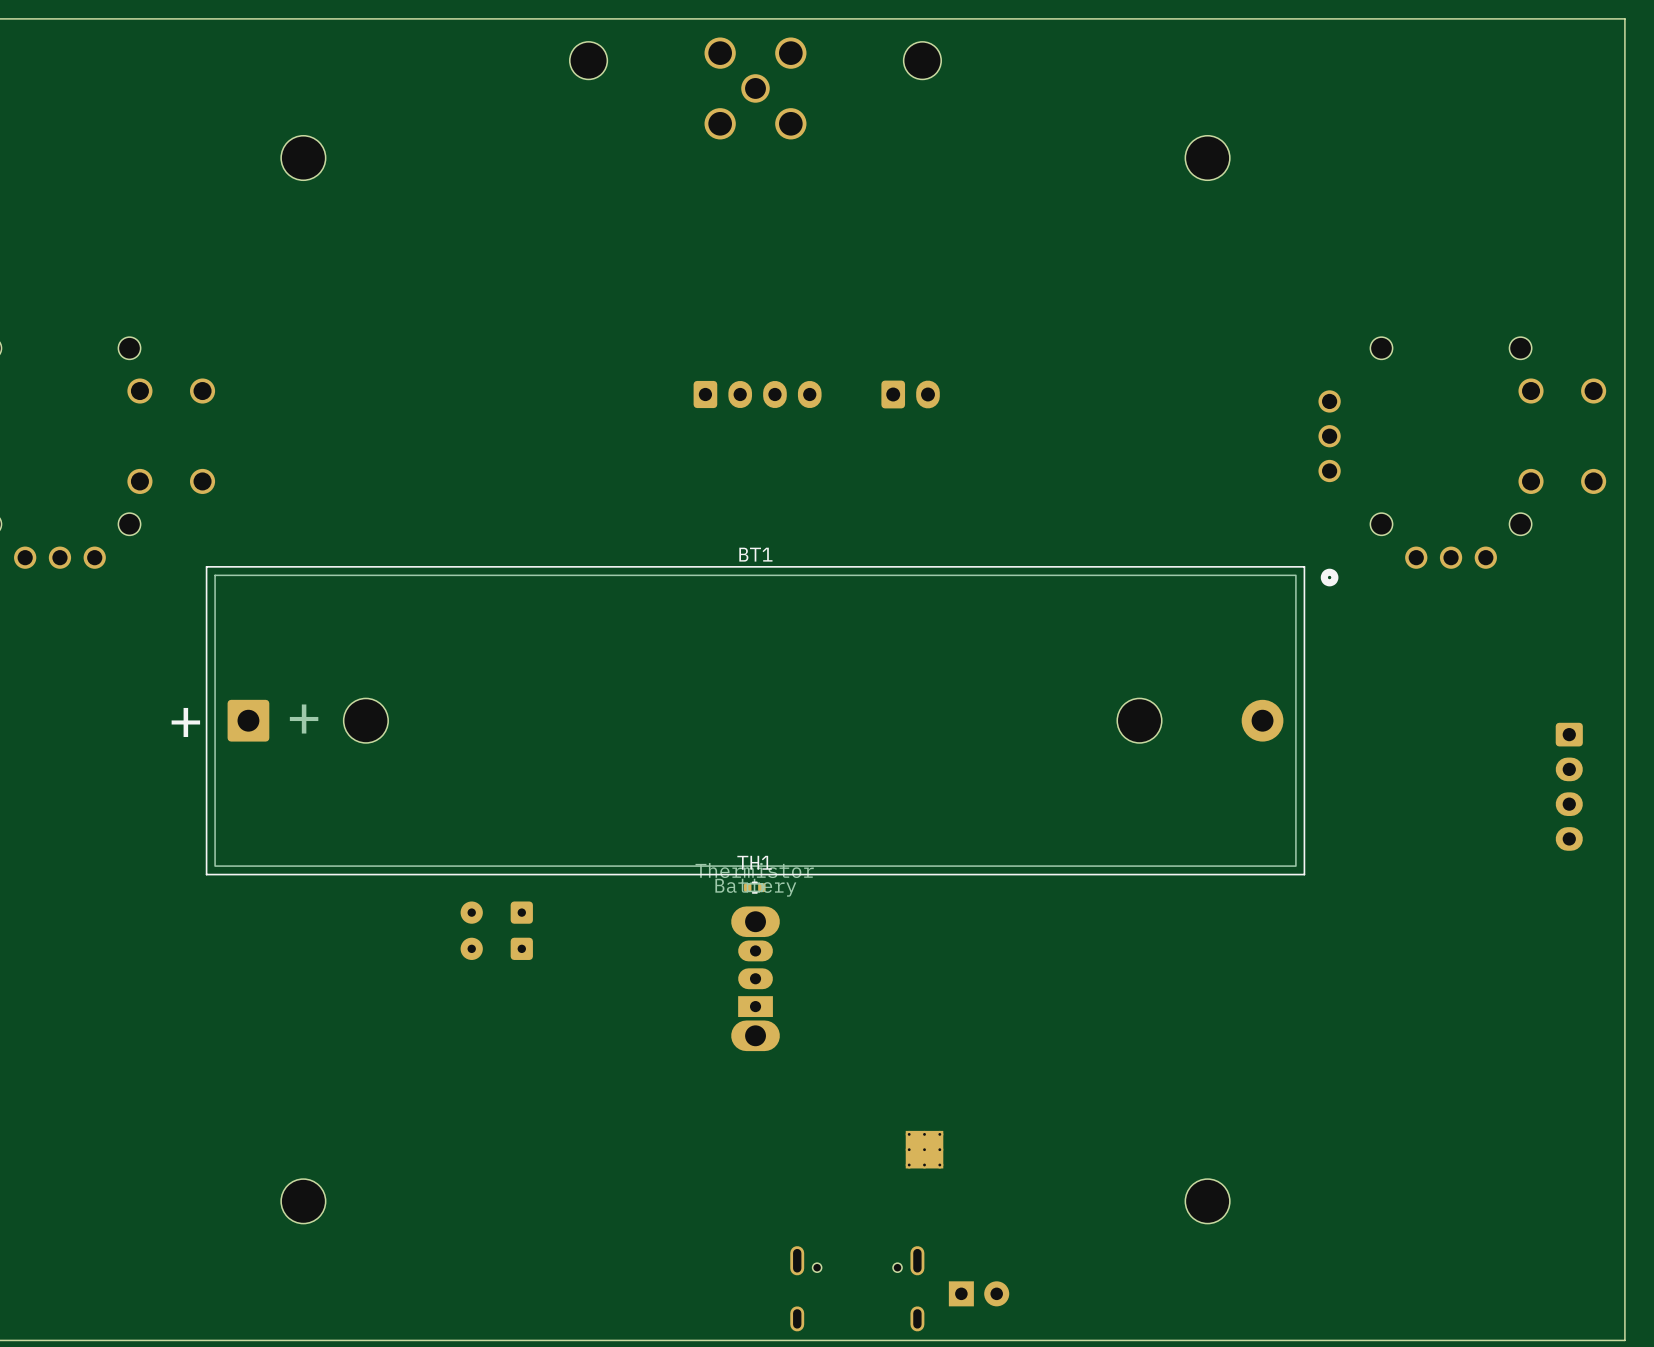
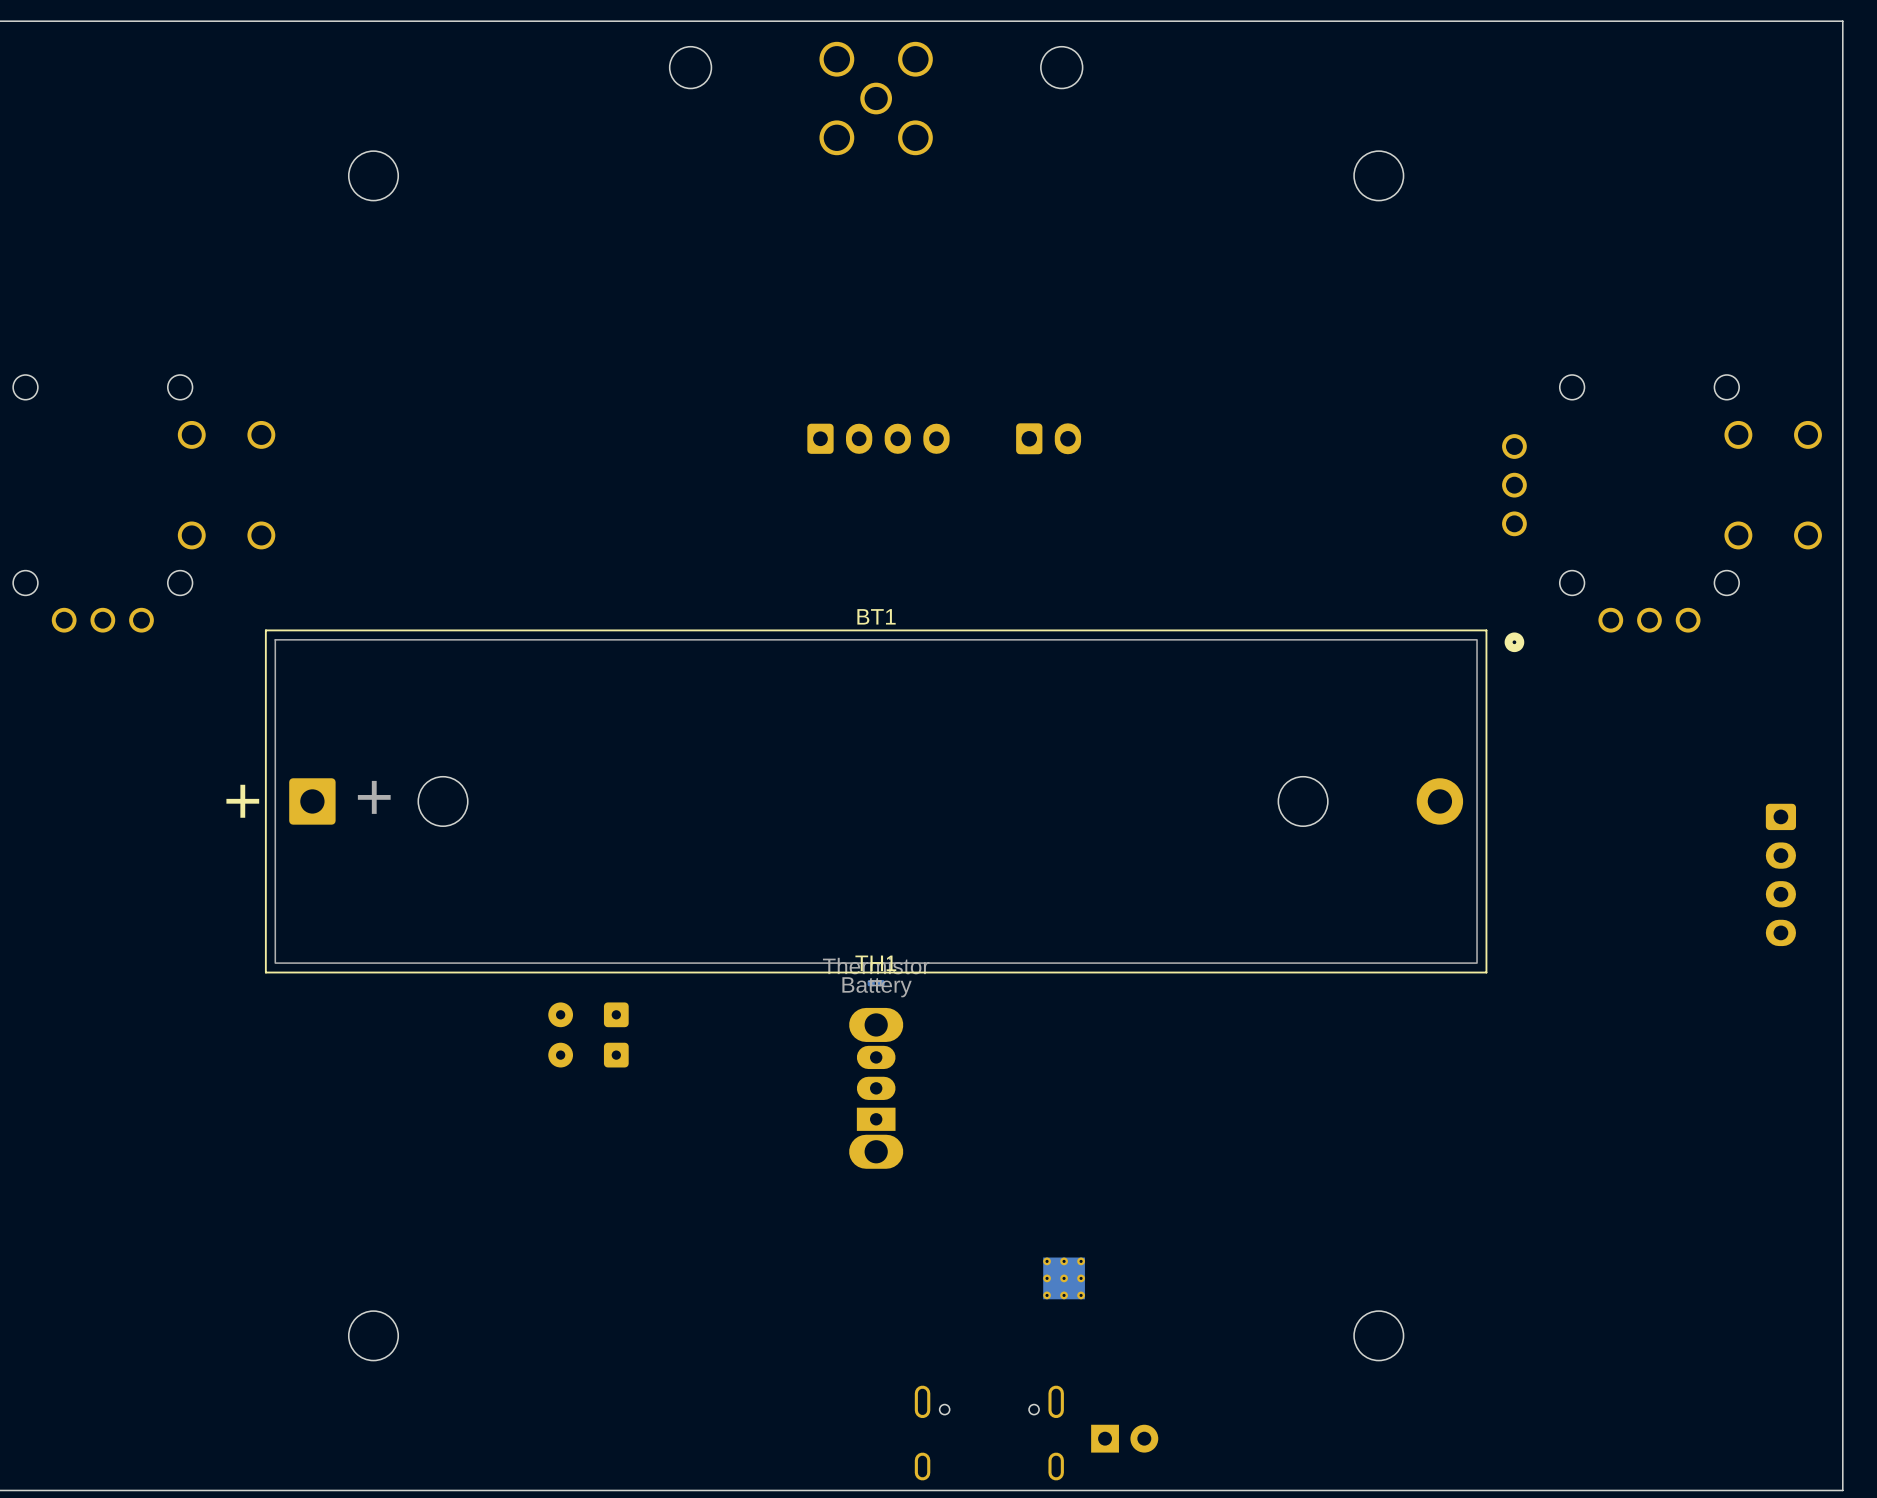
TH1 footprint: [743, 881, 766, 894] -> [867, 980, 885, 987]

